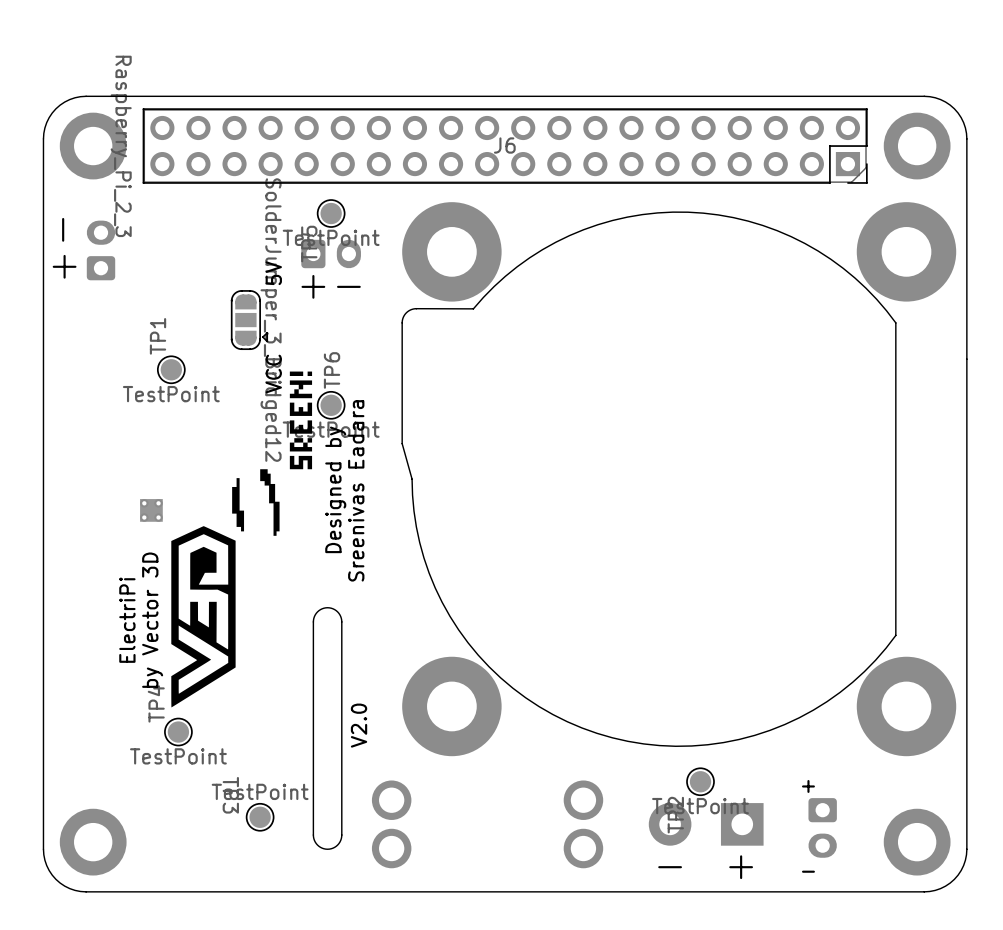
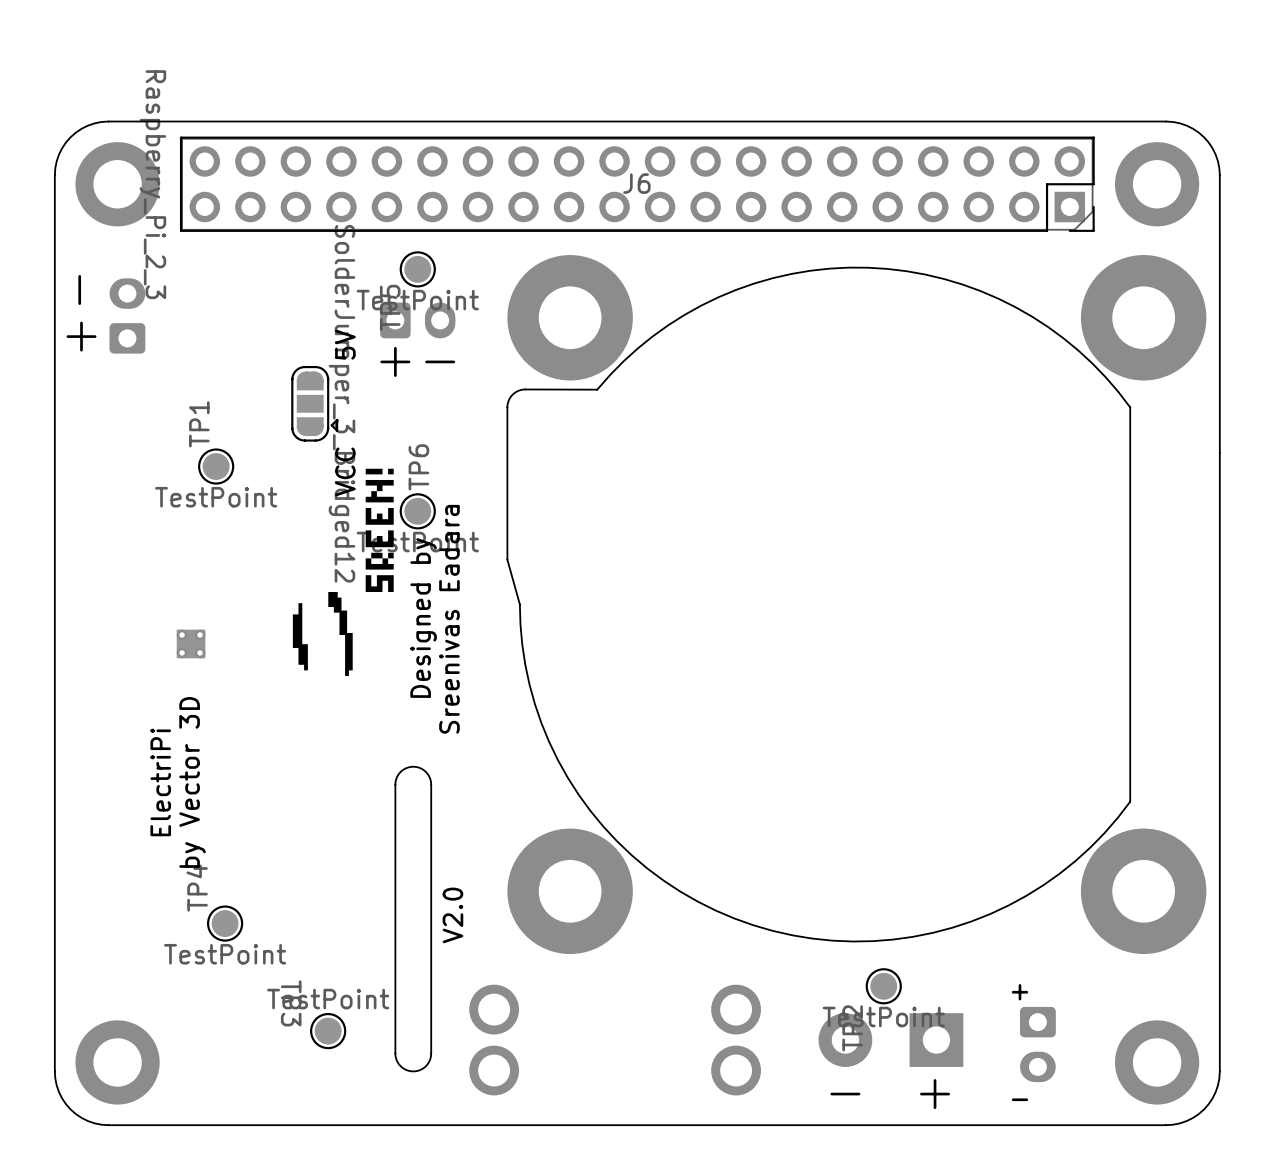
drawing: [171, 526, 236, 708] -> none

